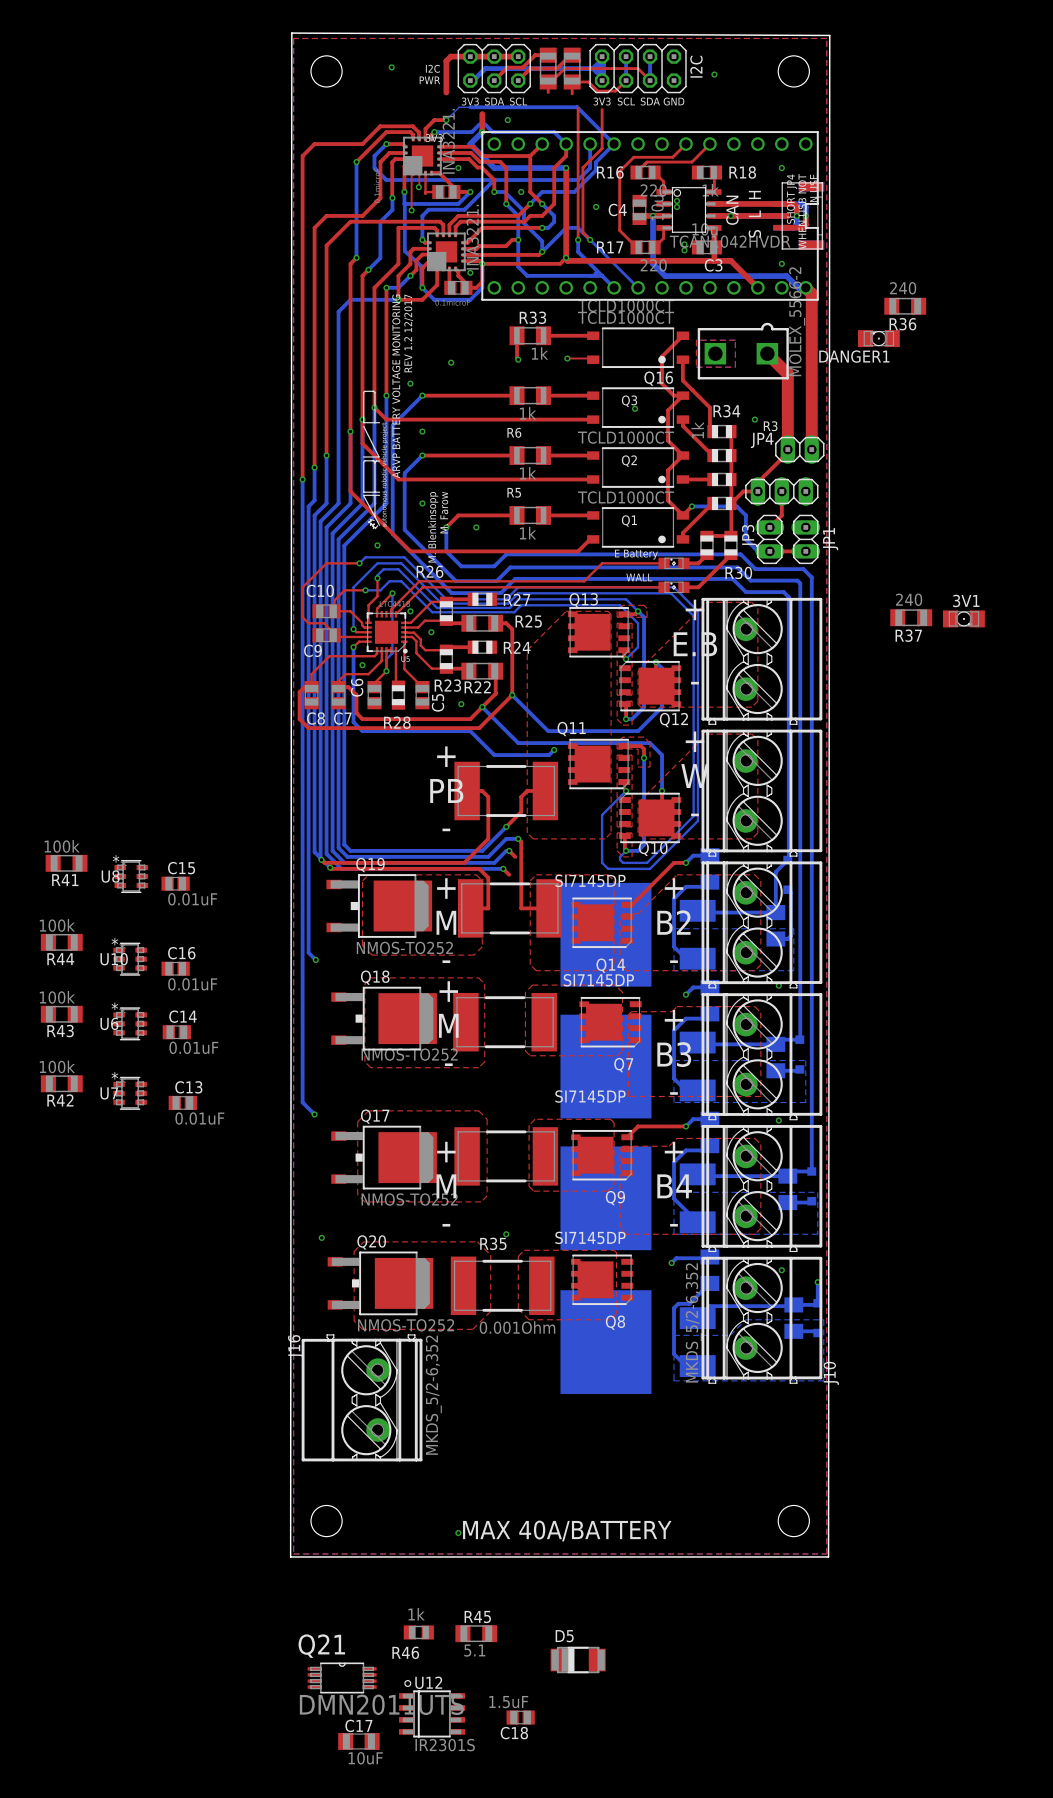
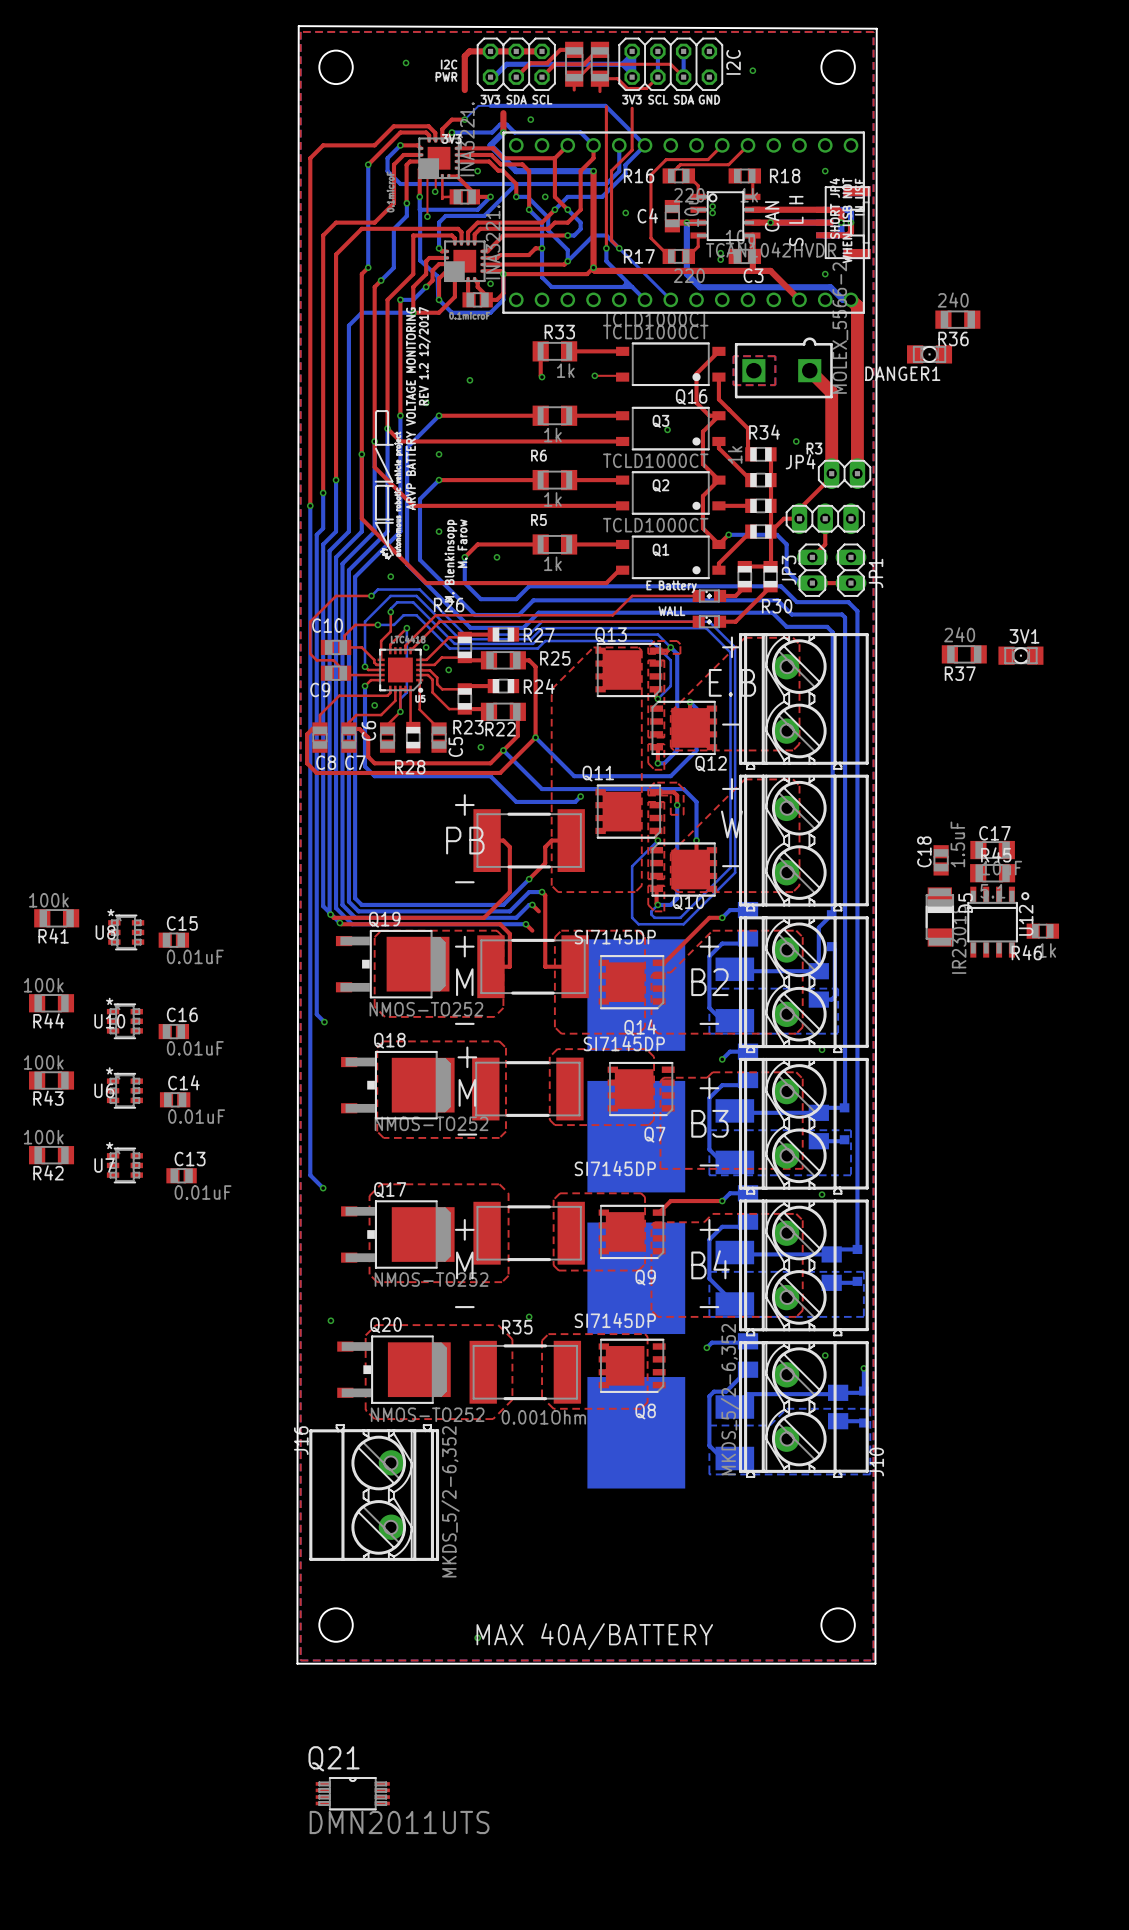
R46 value position: 1k (416, 1614) -> 1k (1047, 950)
R46 position: (418, 1632) -> (1042, 931)
R45 position: (476, 1633) -> (992, 873)
D5 rotation: 0° (578, 1660) -> 90° clockwise (939, 917)
D5 position: (578, 1660) -> (939, 917)
U12 rotation: 0° (432, 1708) -> 90° clockwise (998, 922)
U12 position: (432, 1708) -> (998, 922)
C18 rotation: 0° (520, 1717) -> 90° clockwise (941, 860)
C18 position: (520, 1717) -> (941, 860)
C17 position: (358, 1741) -> (992, 850)

